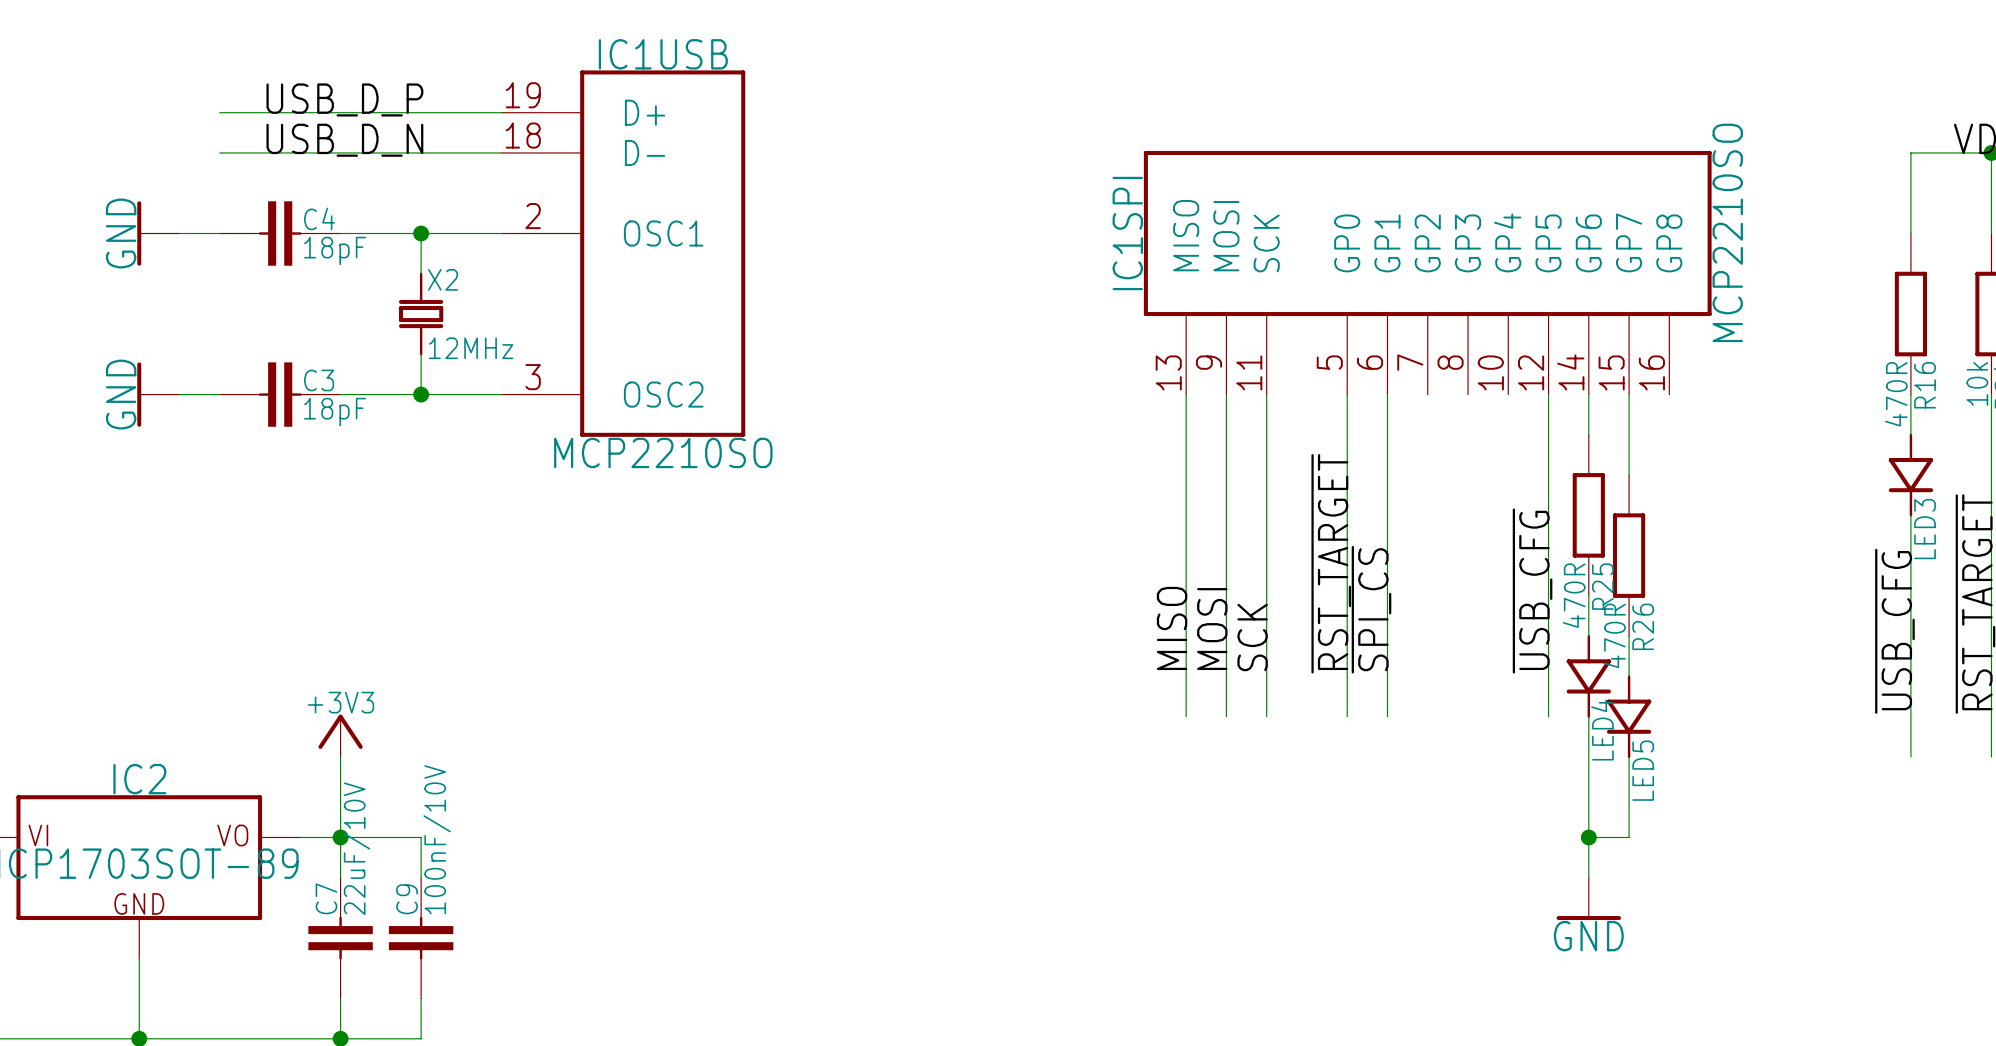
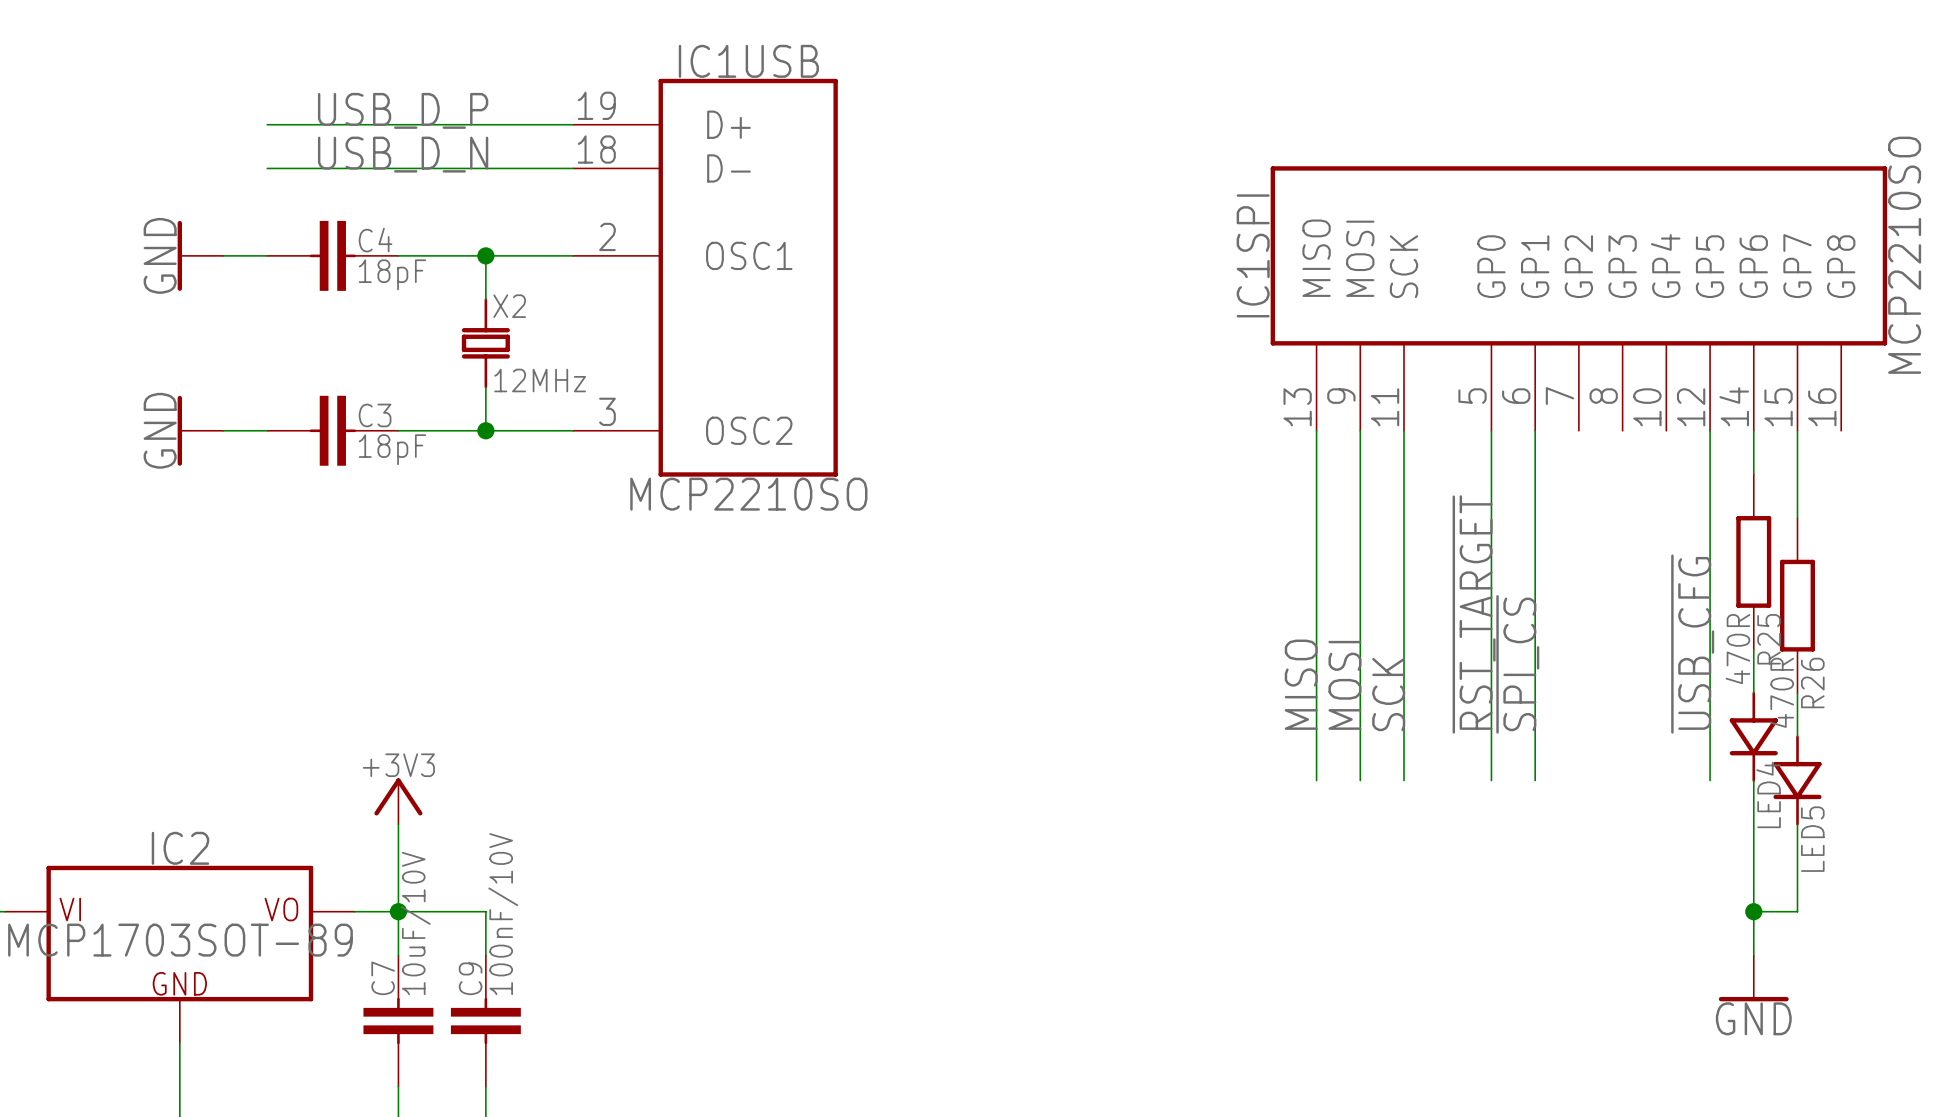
C7 value: 22uF/10V (356, 848) -> 10uF/10V (415, 923)

